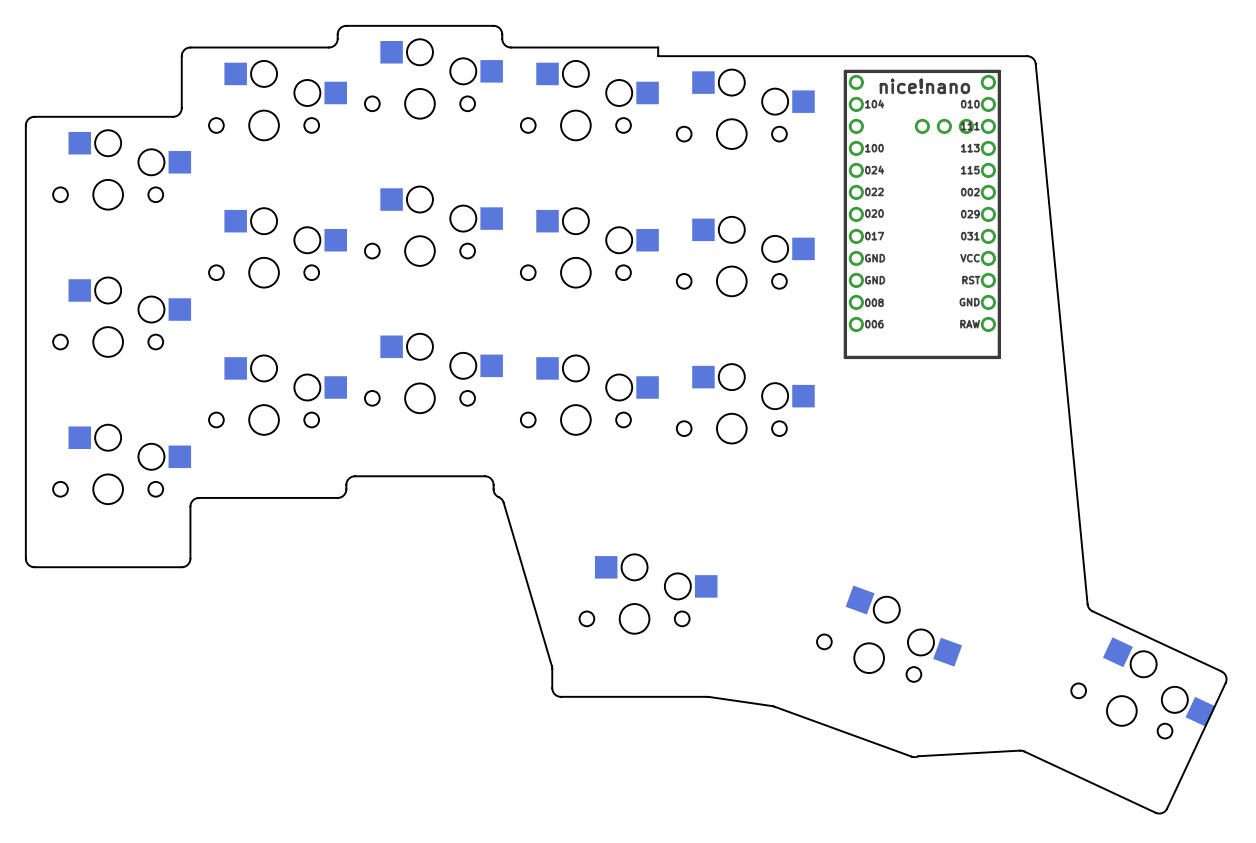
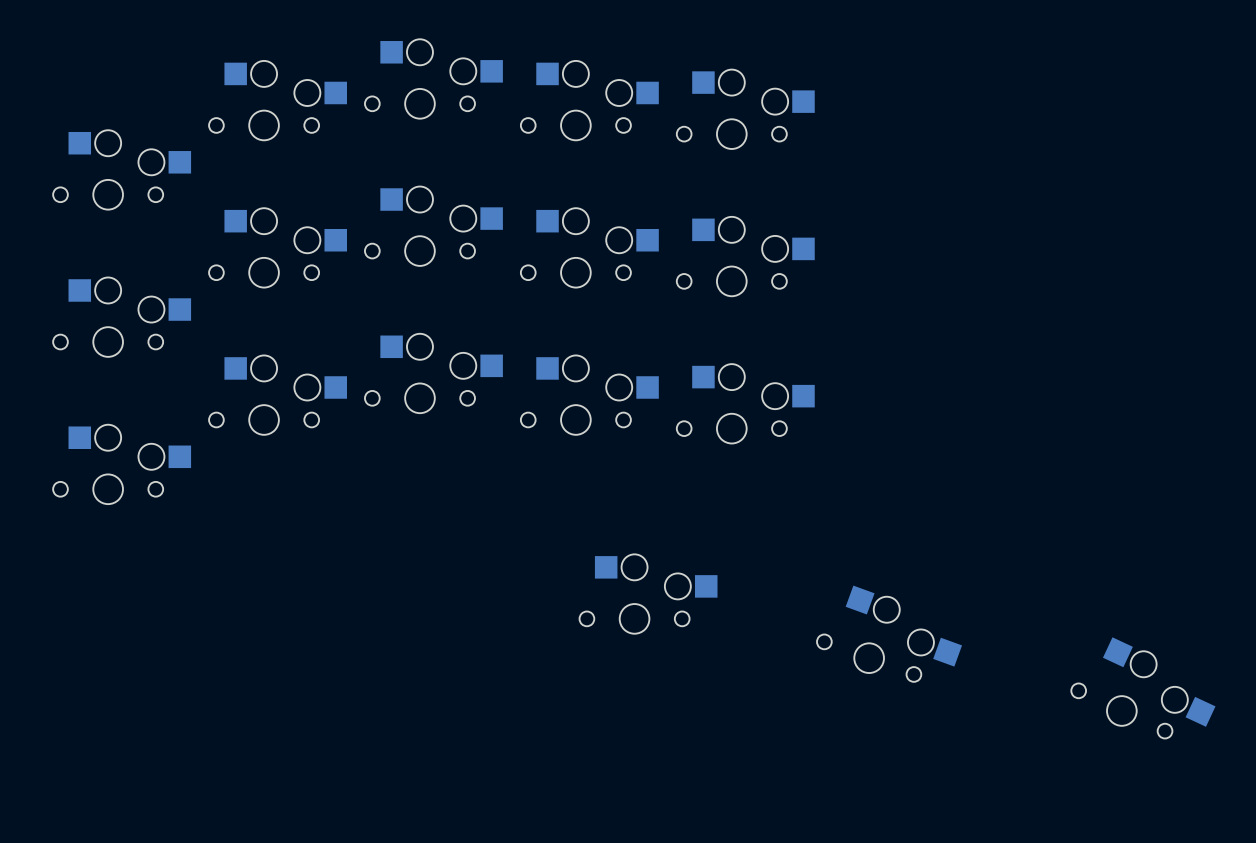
board edge: (346, 25) (494, 25) (500, 29) (503, 43) (509, 47) (658, 47) (658, 56) (1027, 56) (1032, 58) (1035, 64) (1088, 606) (1092, 611) (1221, 671) (1226, 678) (1165, 811) (1155, 812) (1022, 750) (913, 757) (772, 706) (708, 696) (556, 695) (552, 689) (551, 666) (503, 502) (495, 494) (492, 481) (487, 476) (353, 476) (347, 480) (344, 494) (338, 497) (197, 498) (192, 500) (190, 505) (190, 559) (185, 566) (34, 567) (28, 564) (25, 558) (27, 121) (34, 116) (175, 116) (181, 109) (181, 55) (186, 48) (330, 47) (336, 43) (339, 29) (346, 25) -> none
part: (922, 214) -> none

